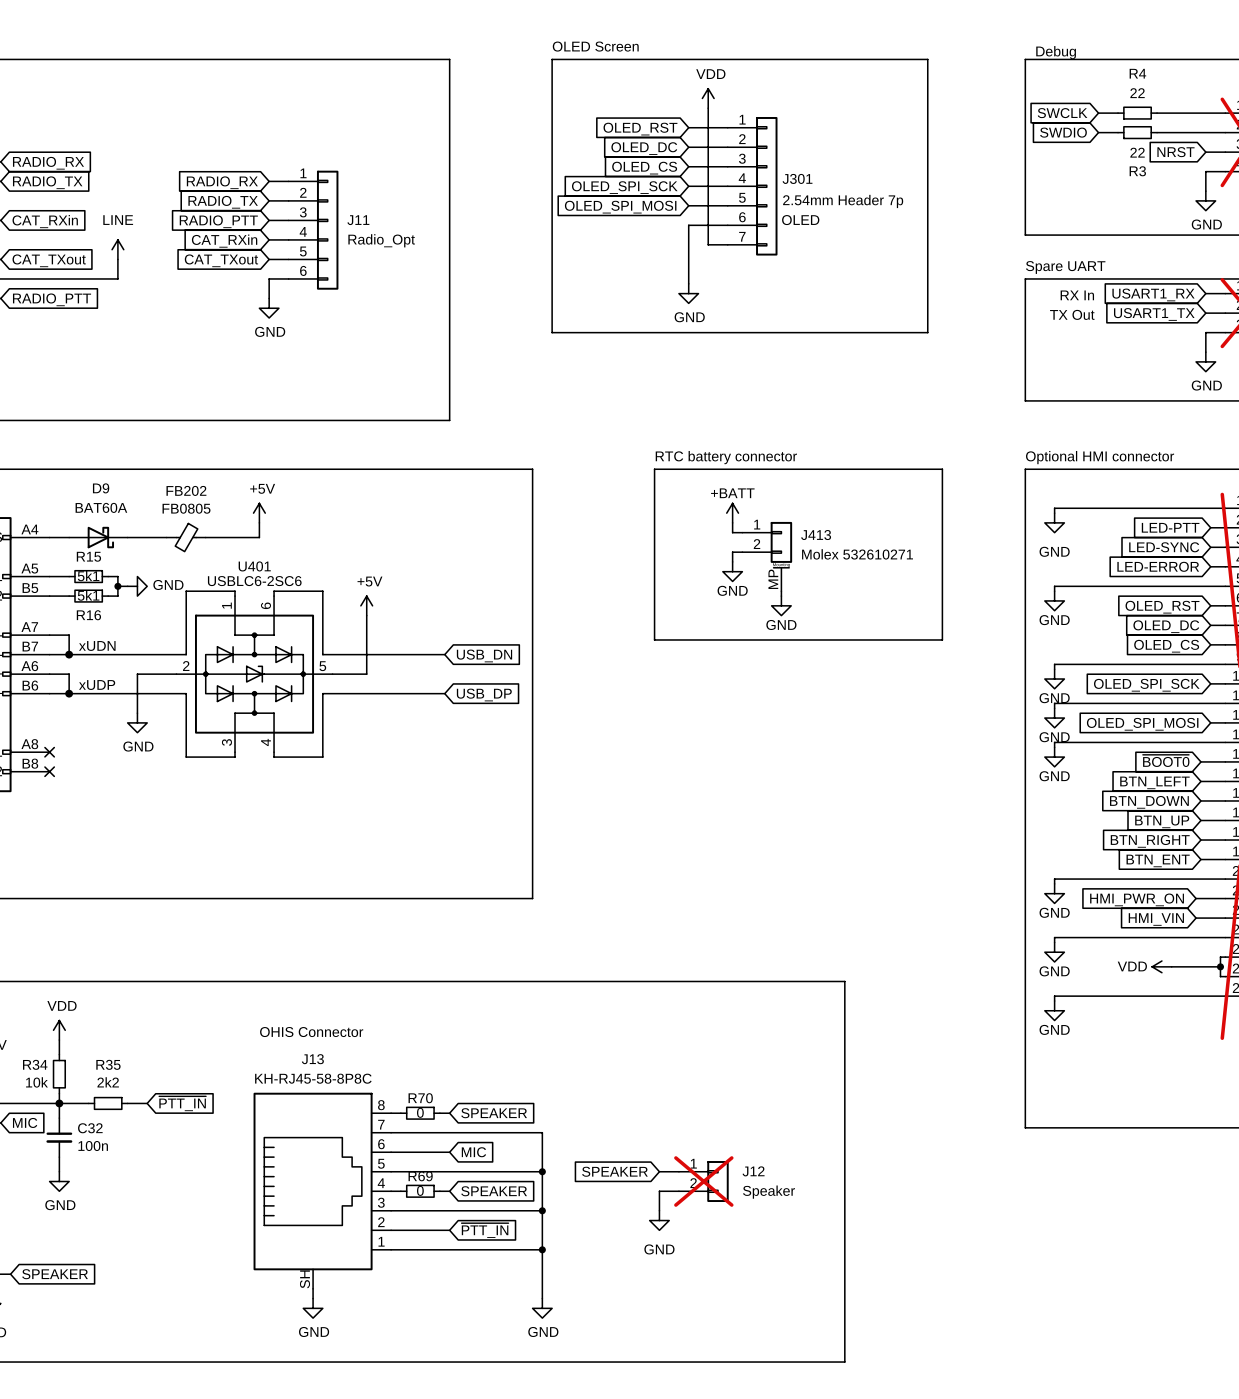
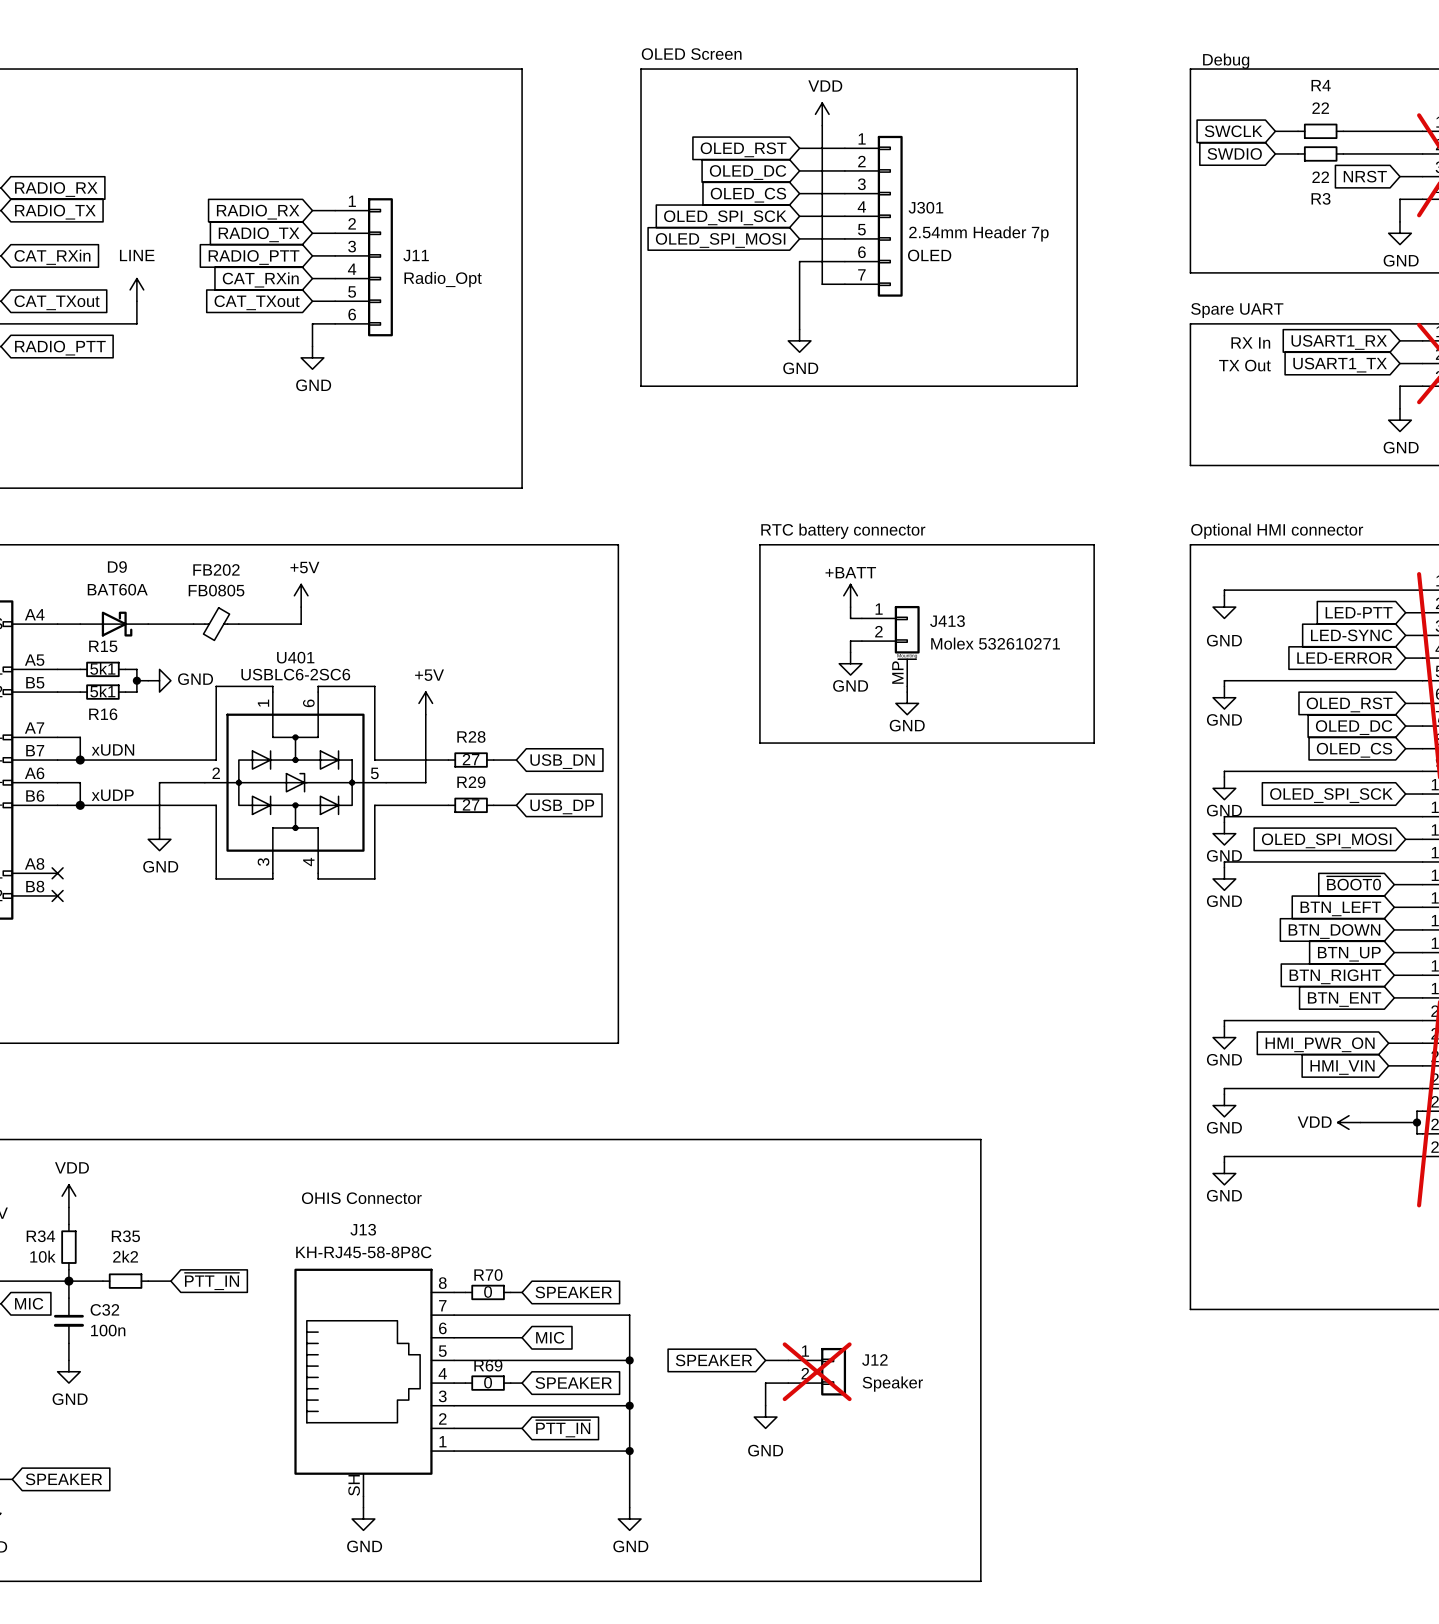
wire: (386, 654) (425, 654) -> none
R28: none -> 27 (471, 760)
wire: (386, 693) (425, 693) -> none
R29: none -> 27 (471, 805)

